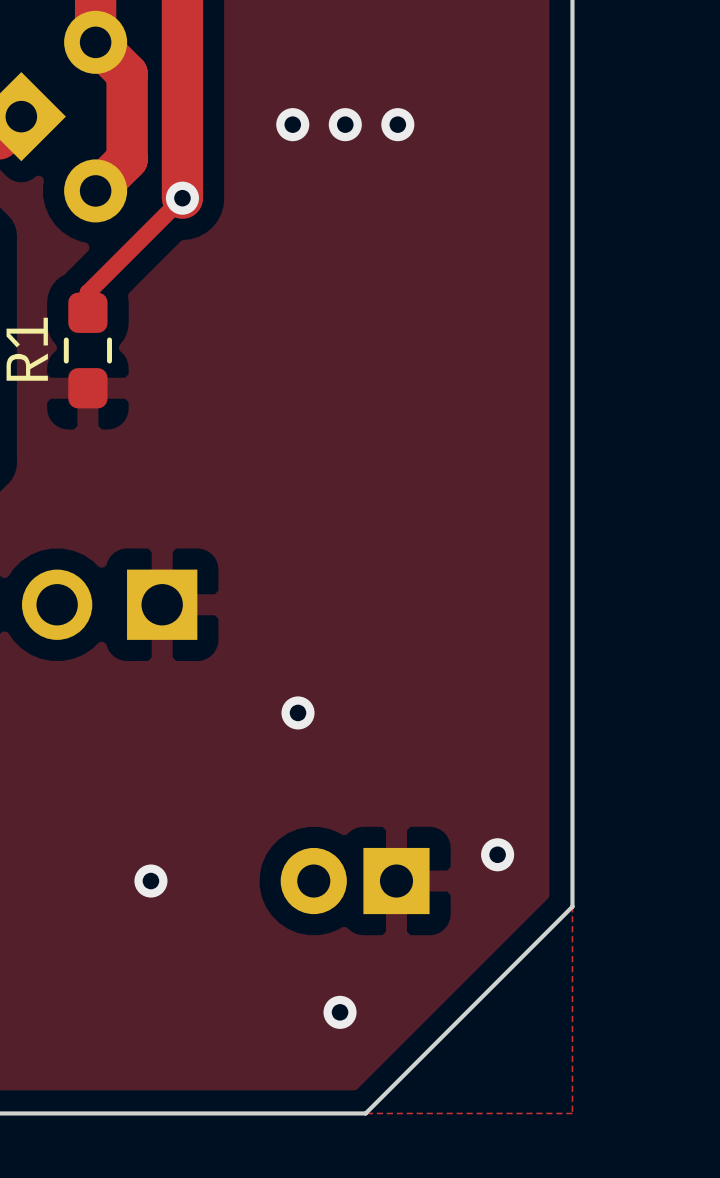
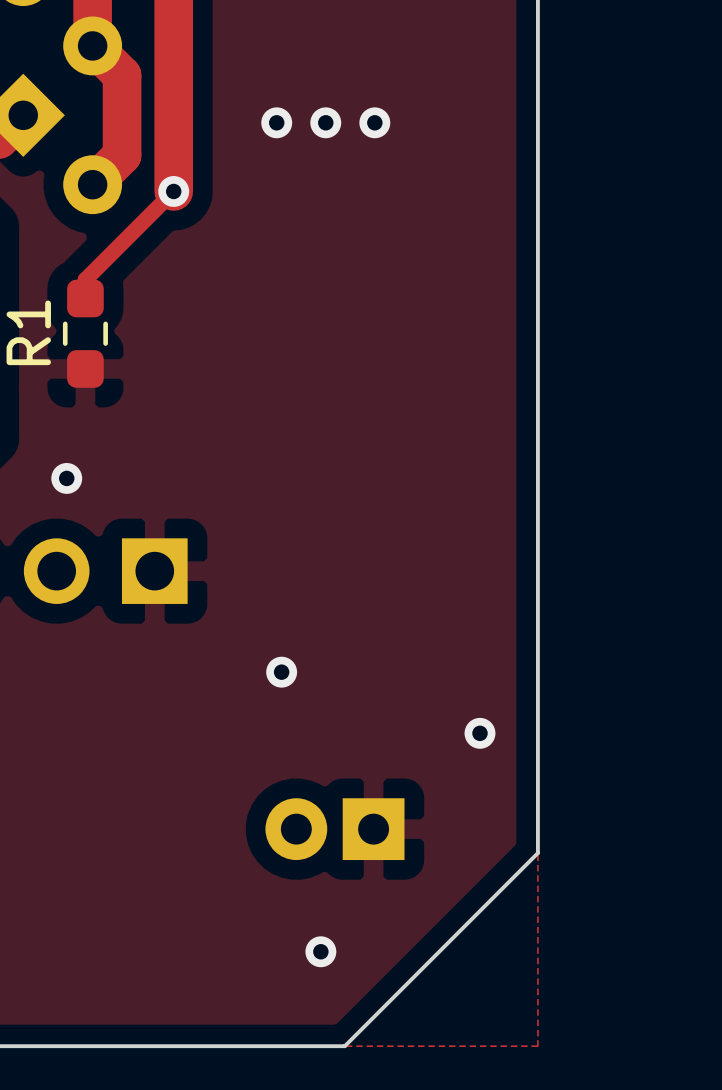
via: none -> (66, 478)
via position: (497, 854) -> (479, 733)
via: (150, 881) -> none

